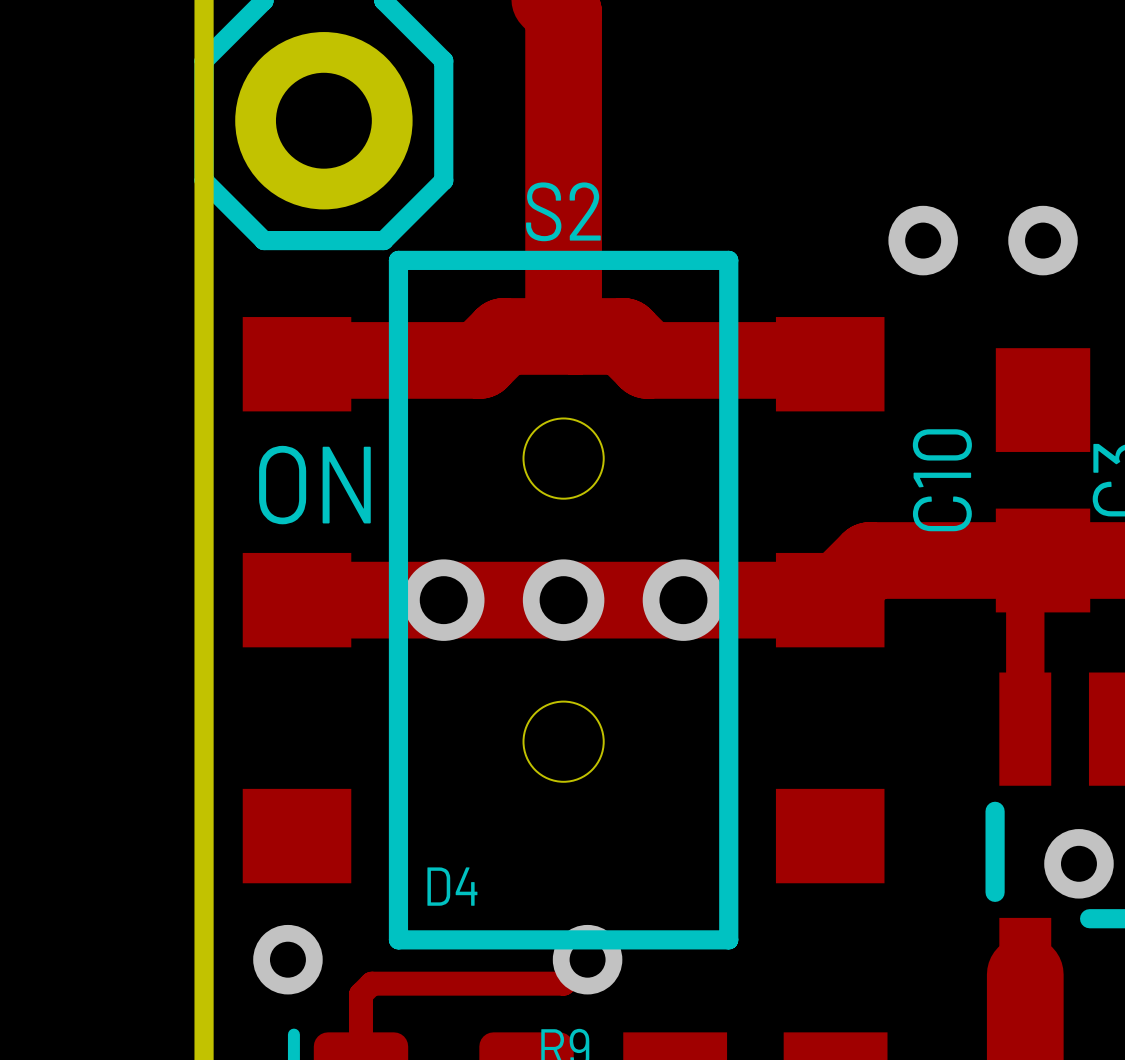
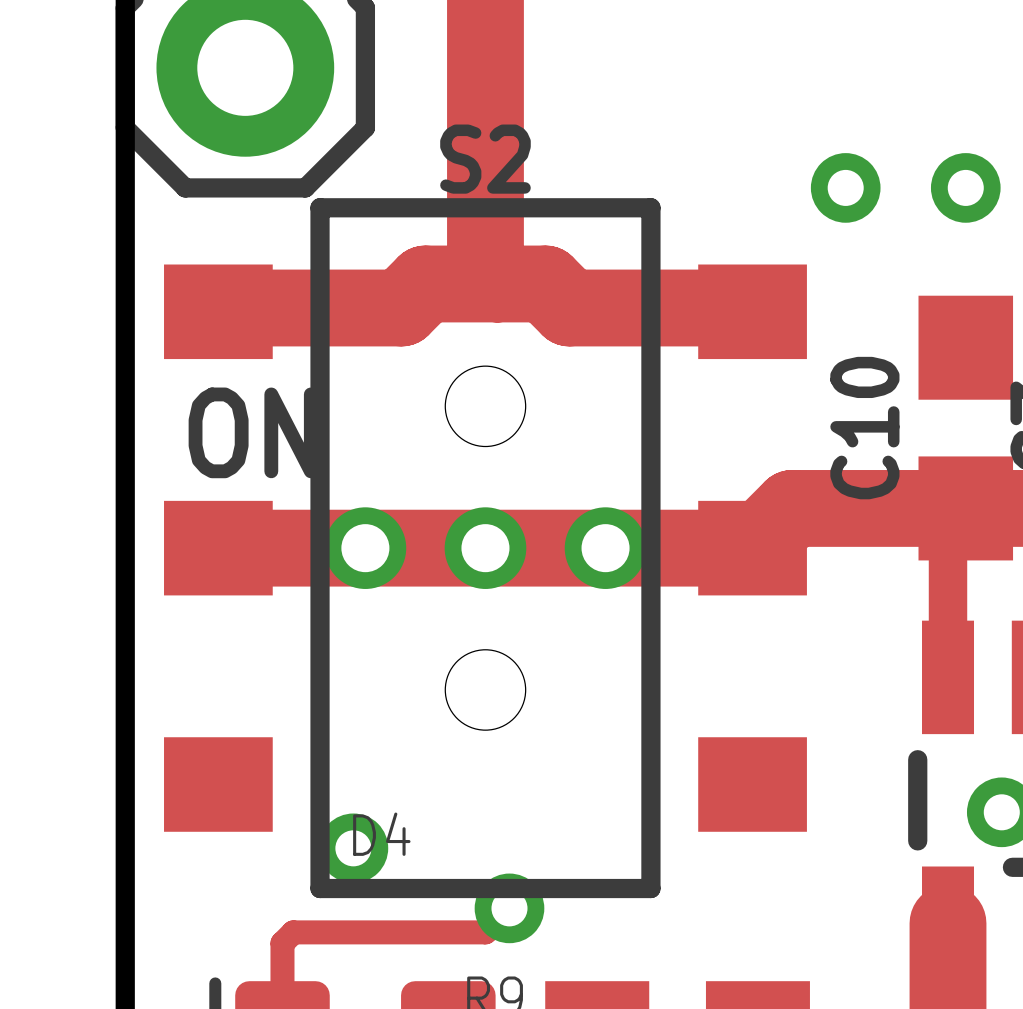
via position: (287, 959) -> (353, 848)

